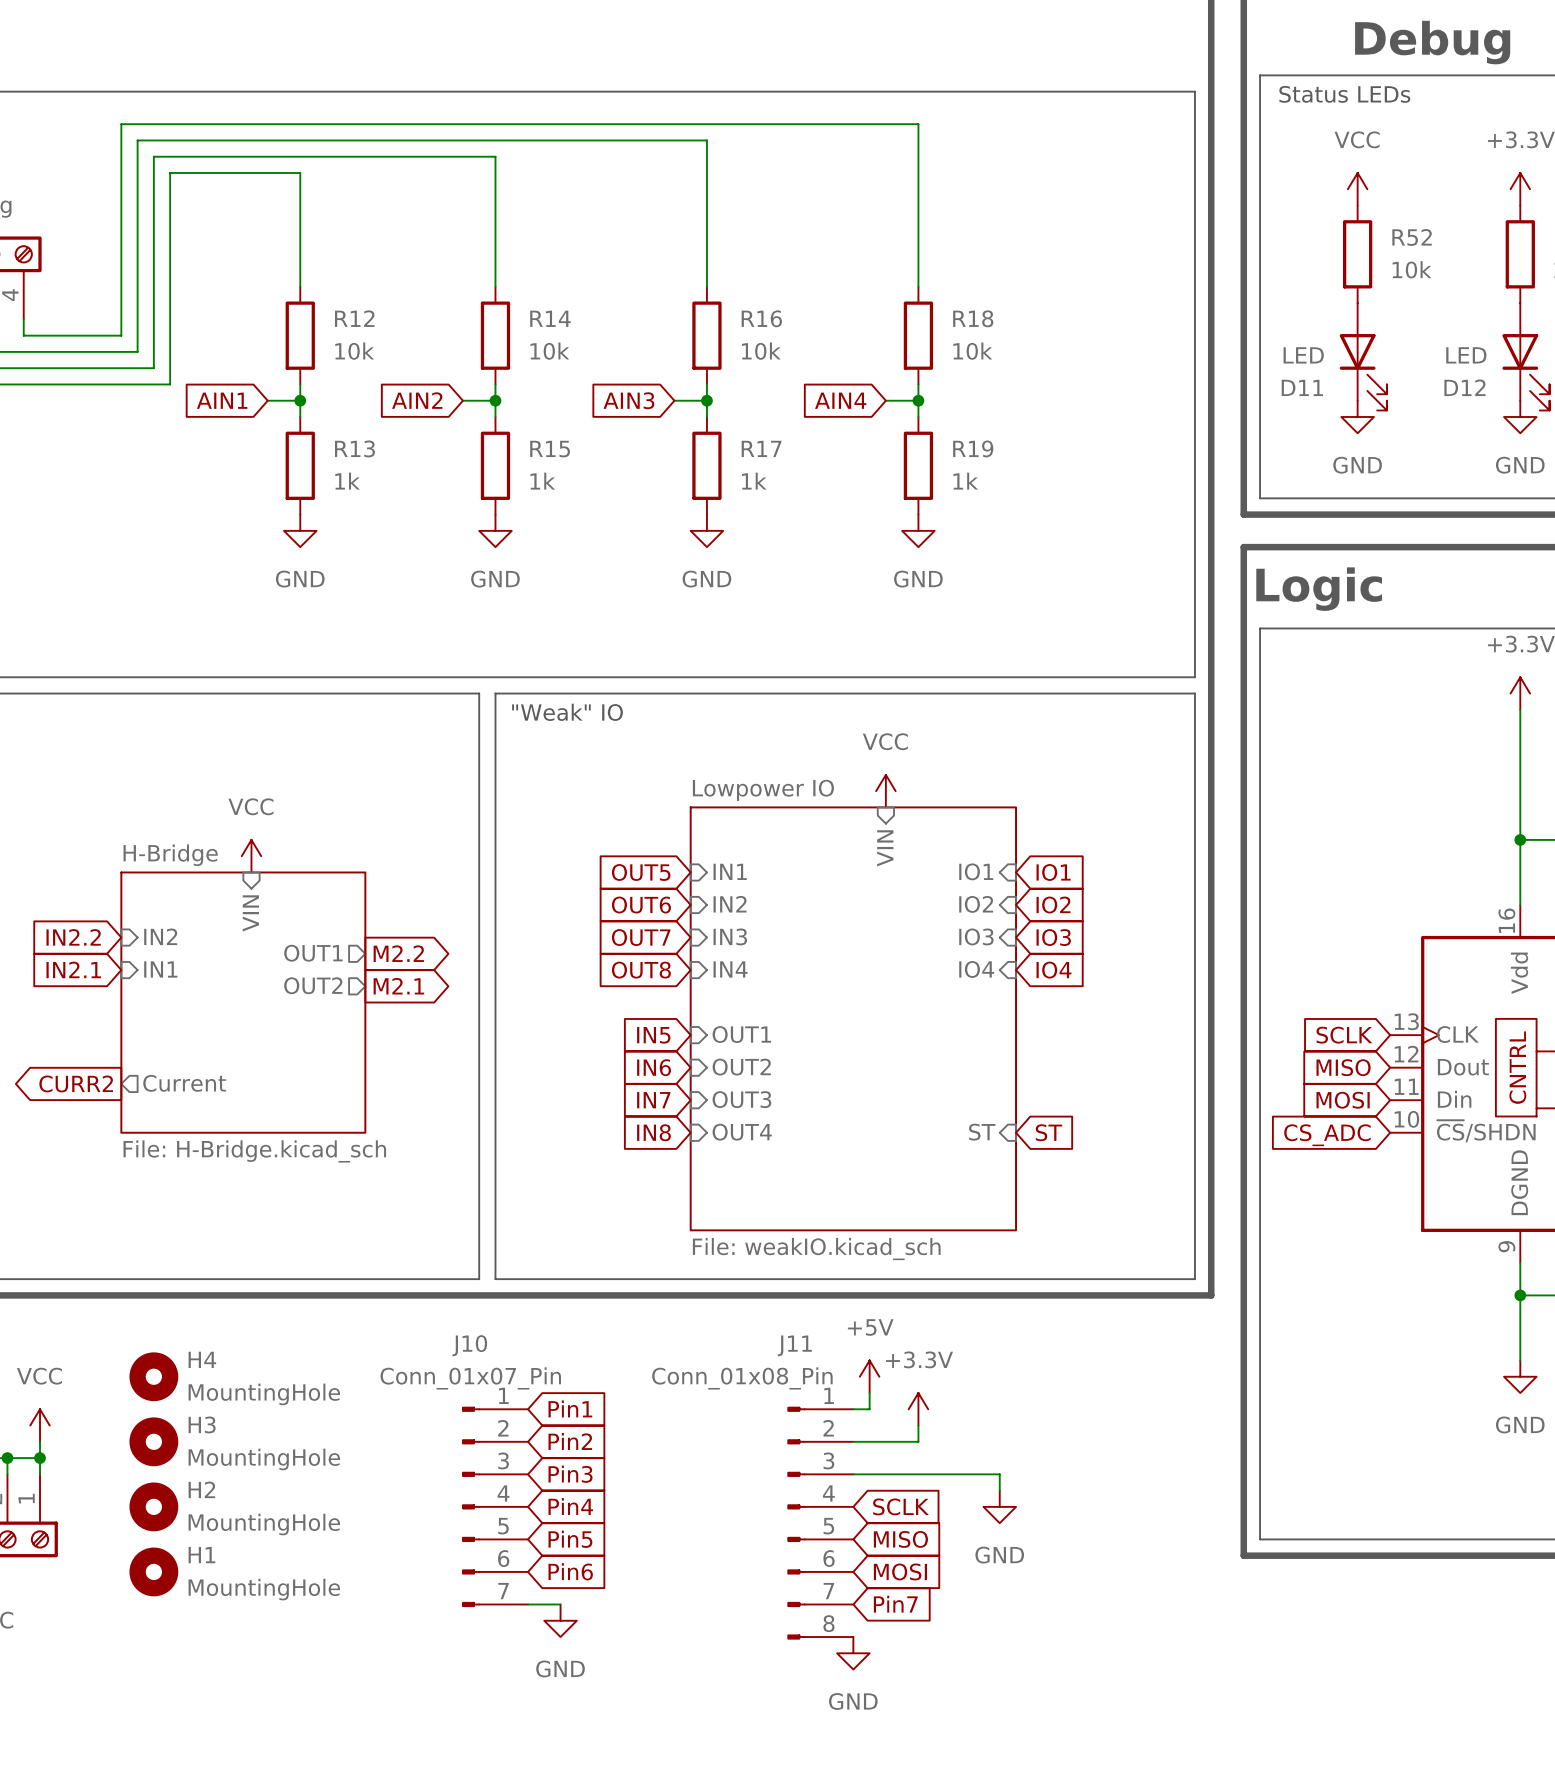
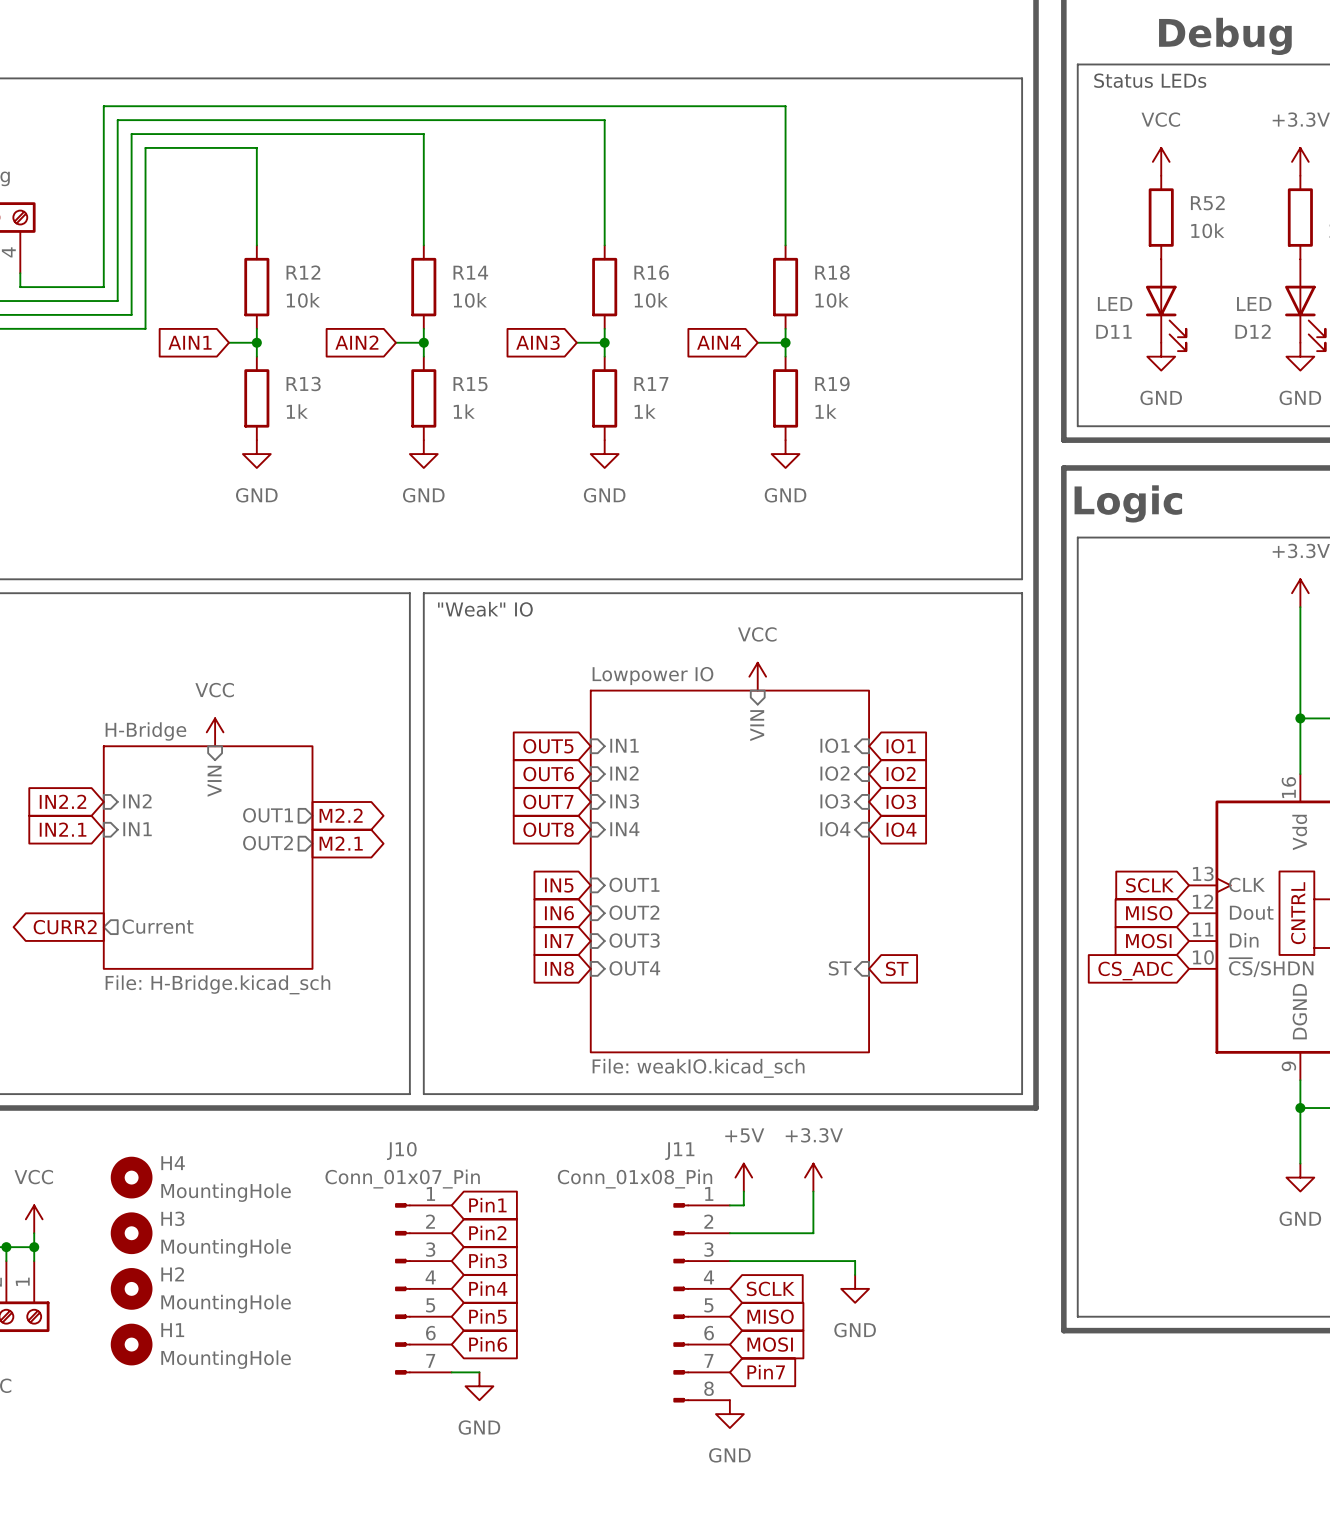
power symbol position: +3.3V (918, 1409) -> +3.3V (813, 1177)
wire: (918, 1425) (918, 1441) -> (813, 1191) (813, 1233) (785, 1233)

